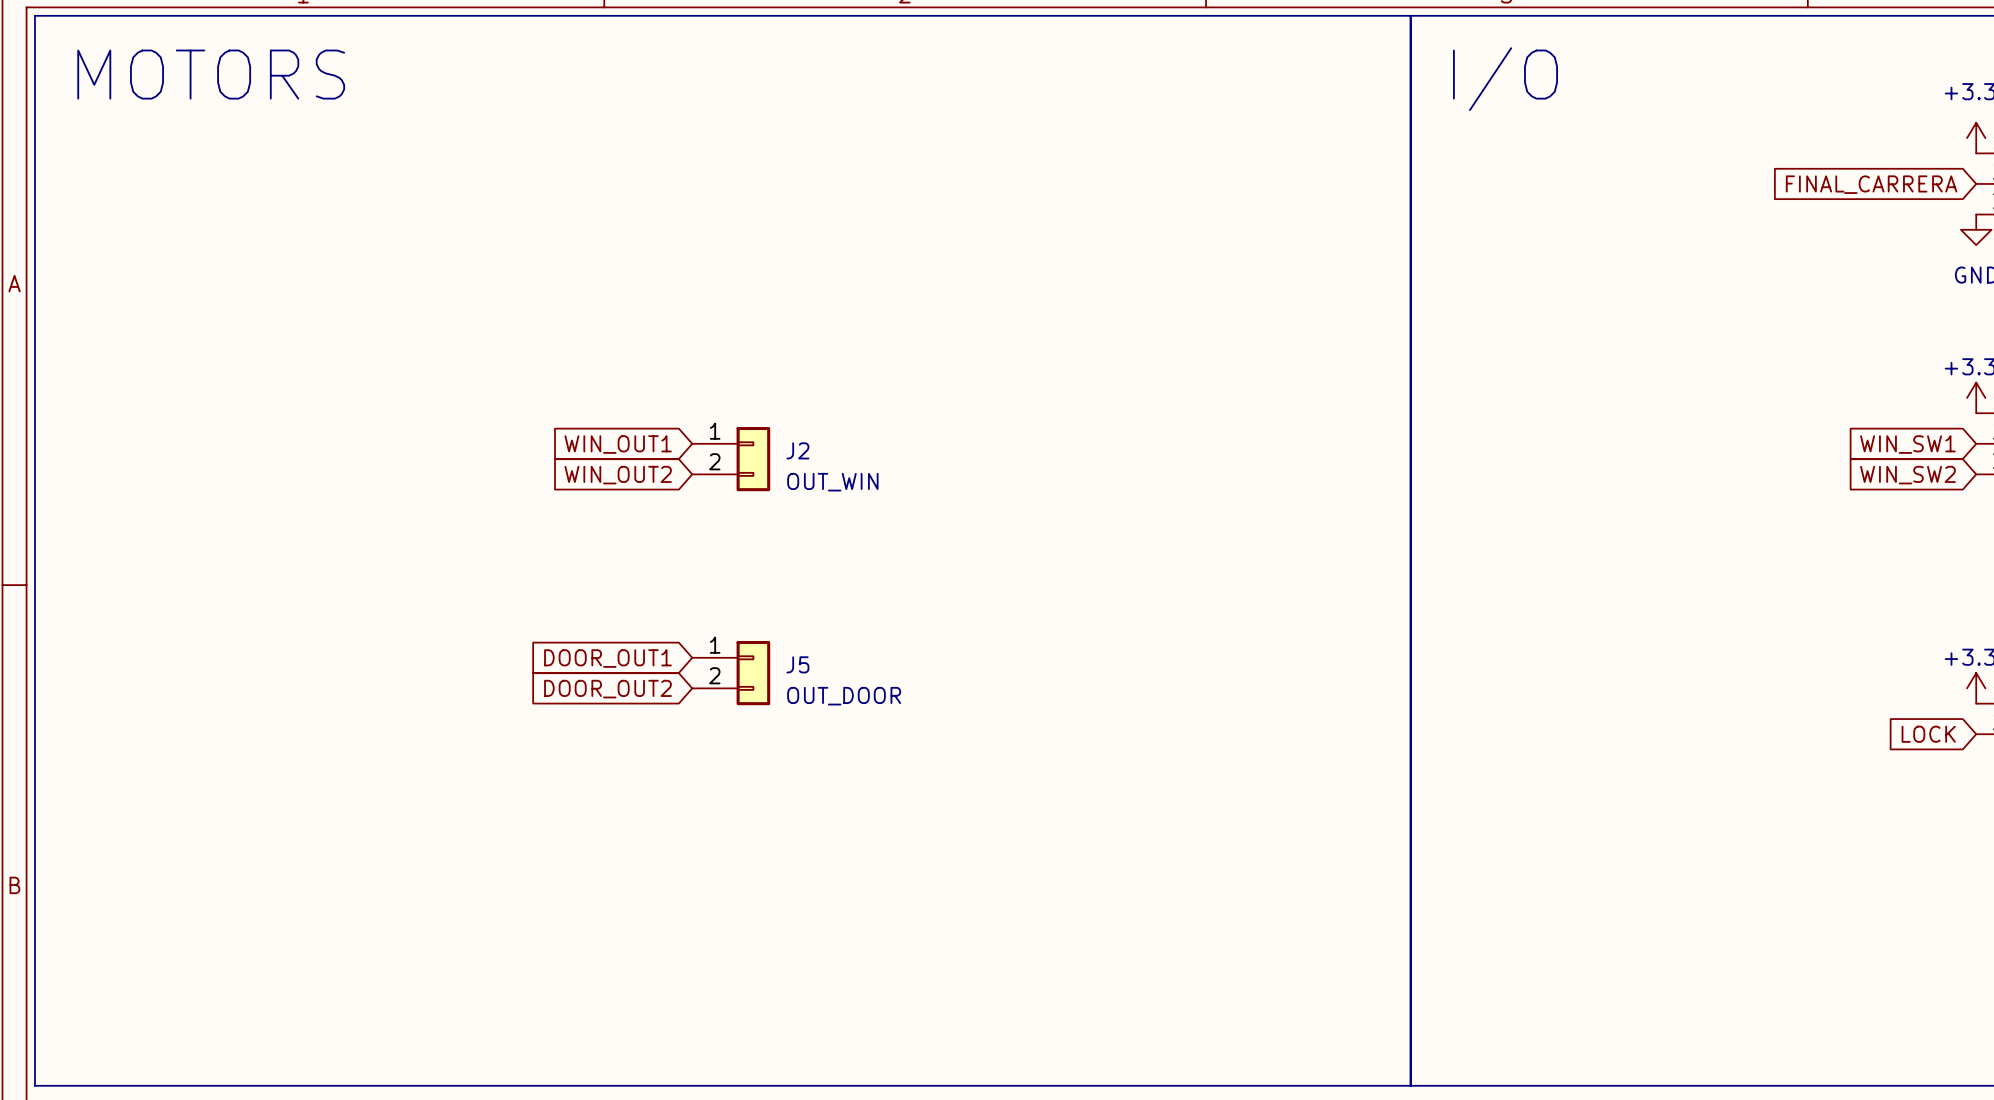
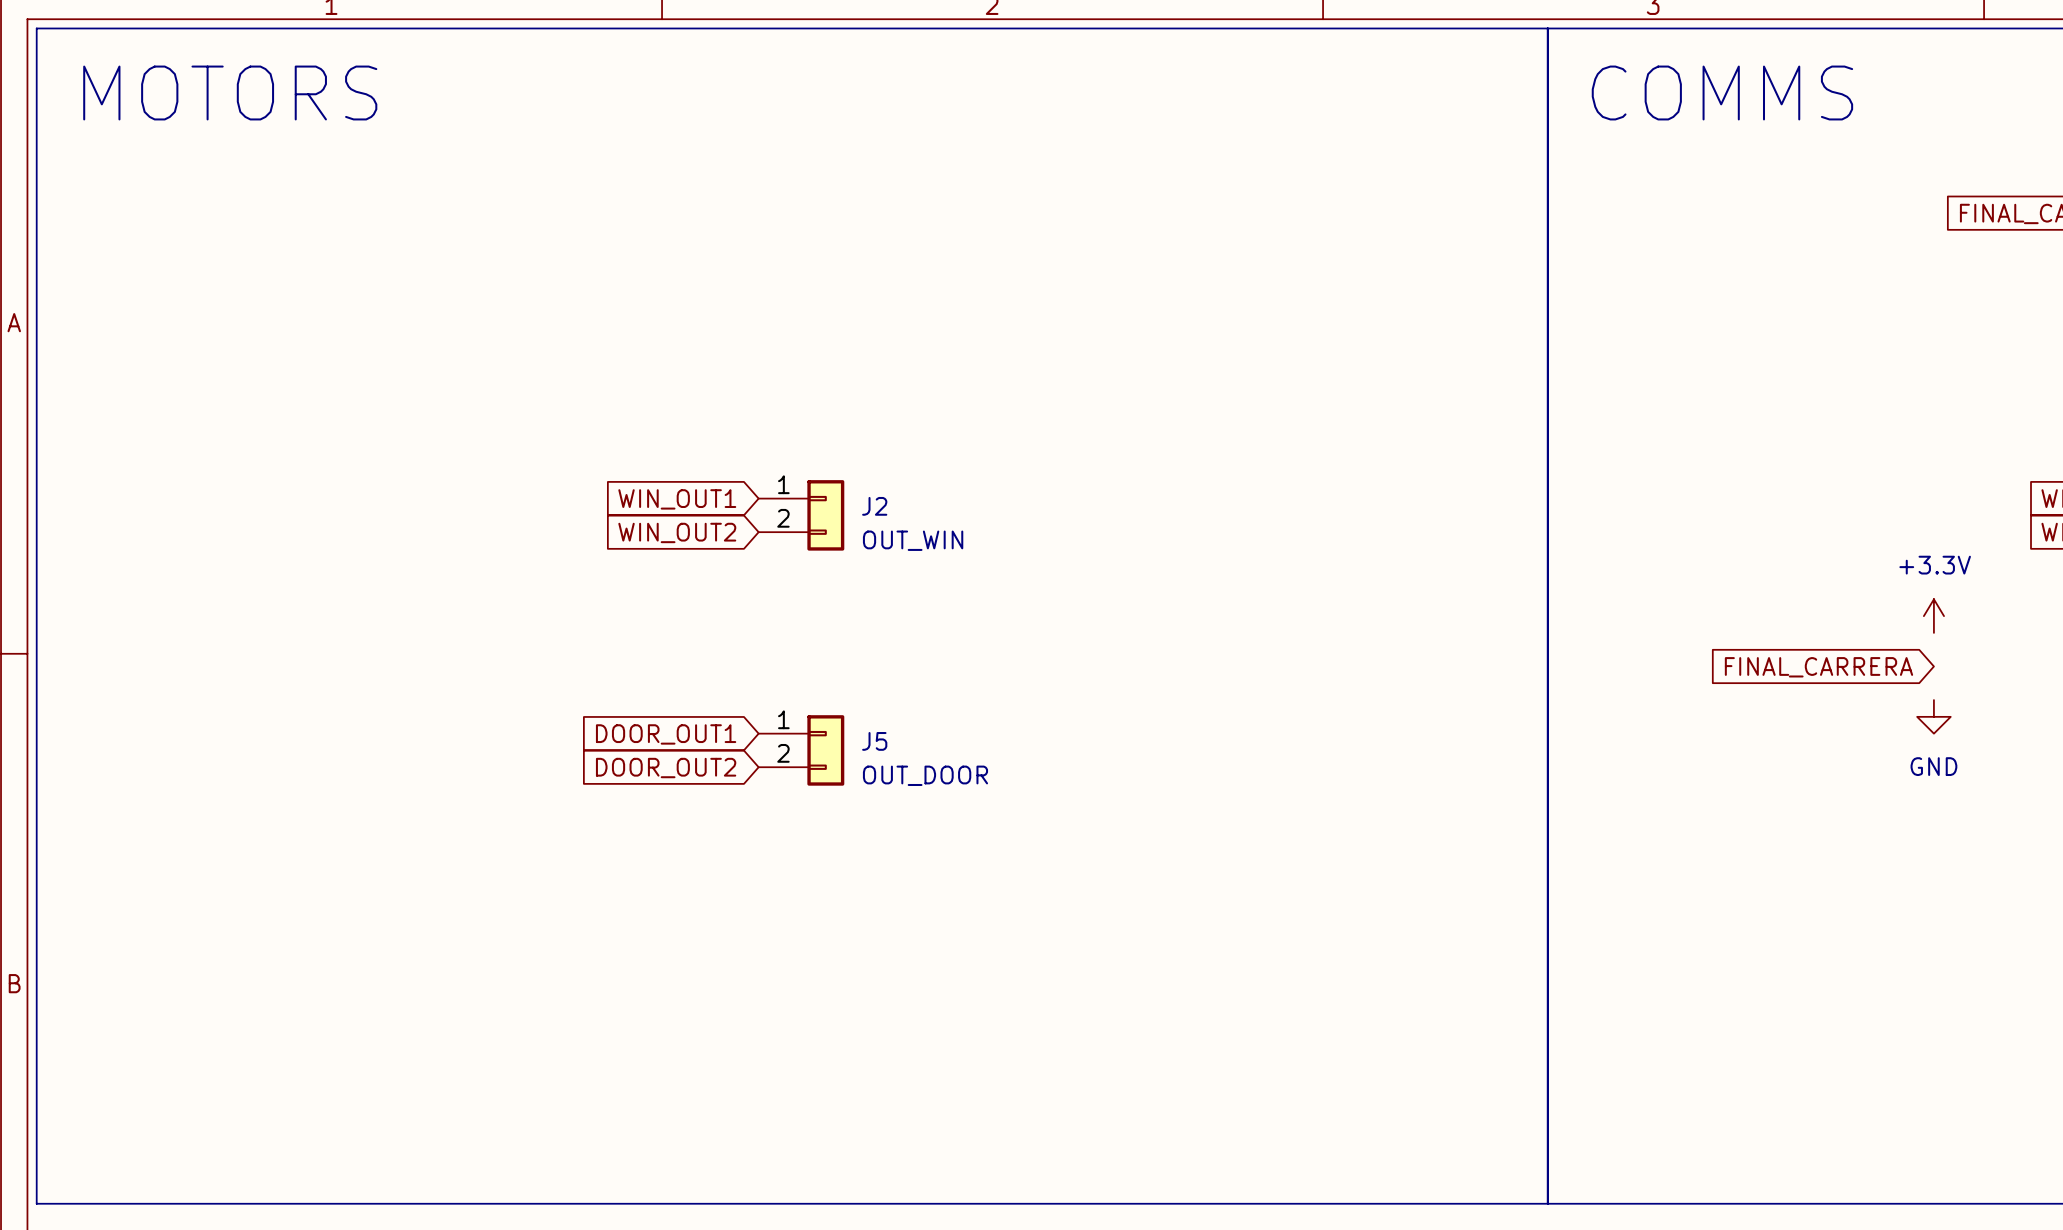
text: I/O (1505, 79) -> COMMS (1722, 93)
power symbol: none -> +3.3V (1933, 616)
global label: none -> FINAL_CARRERA (1818, 667)
power symbol: none -> GND (1933, 716)

